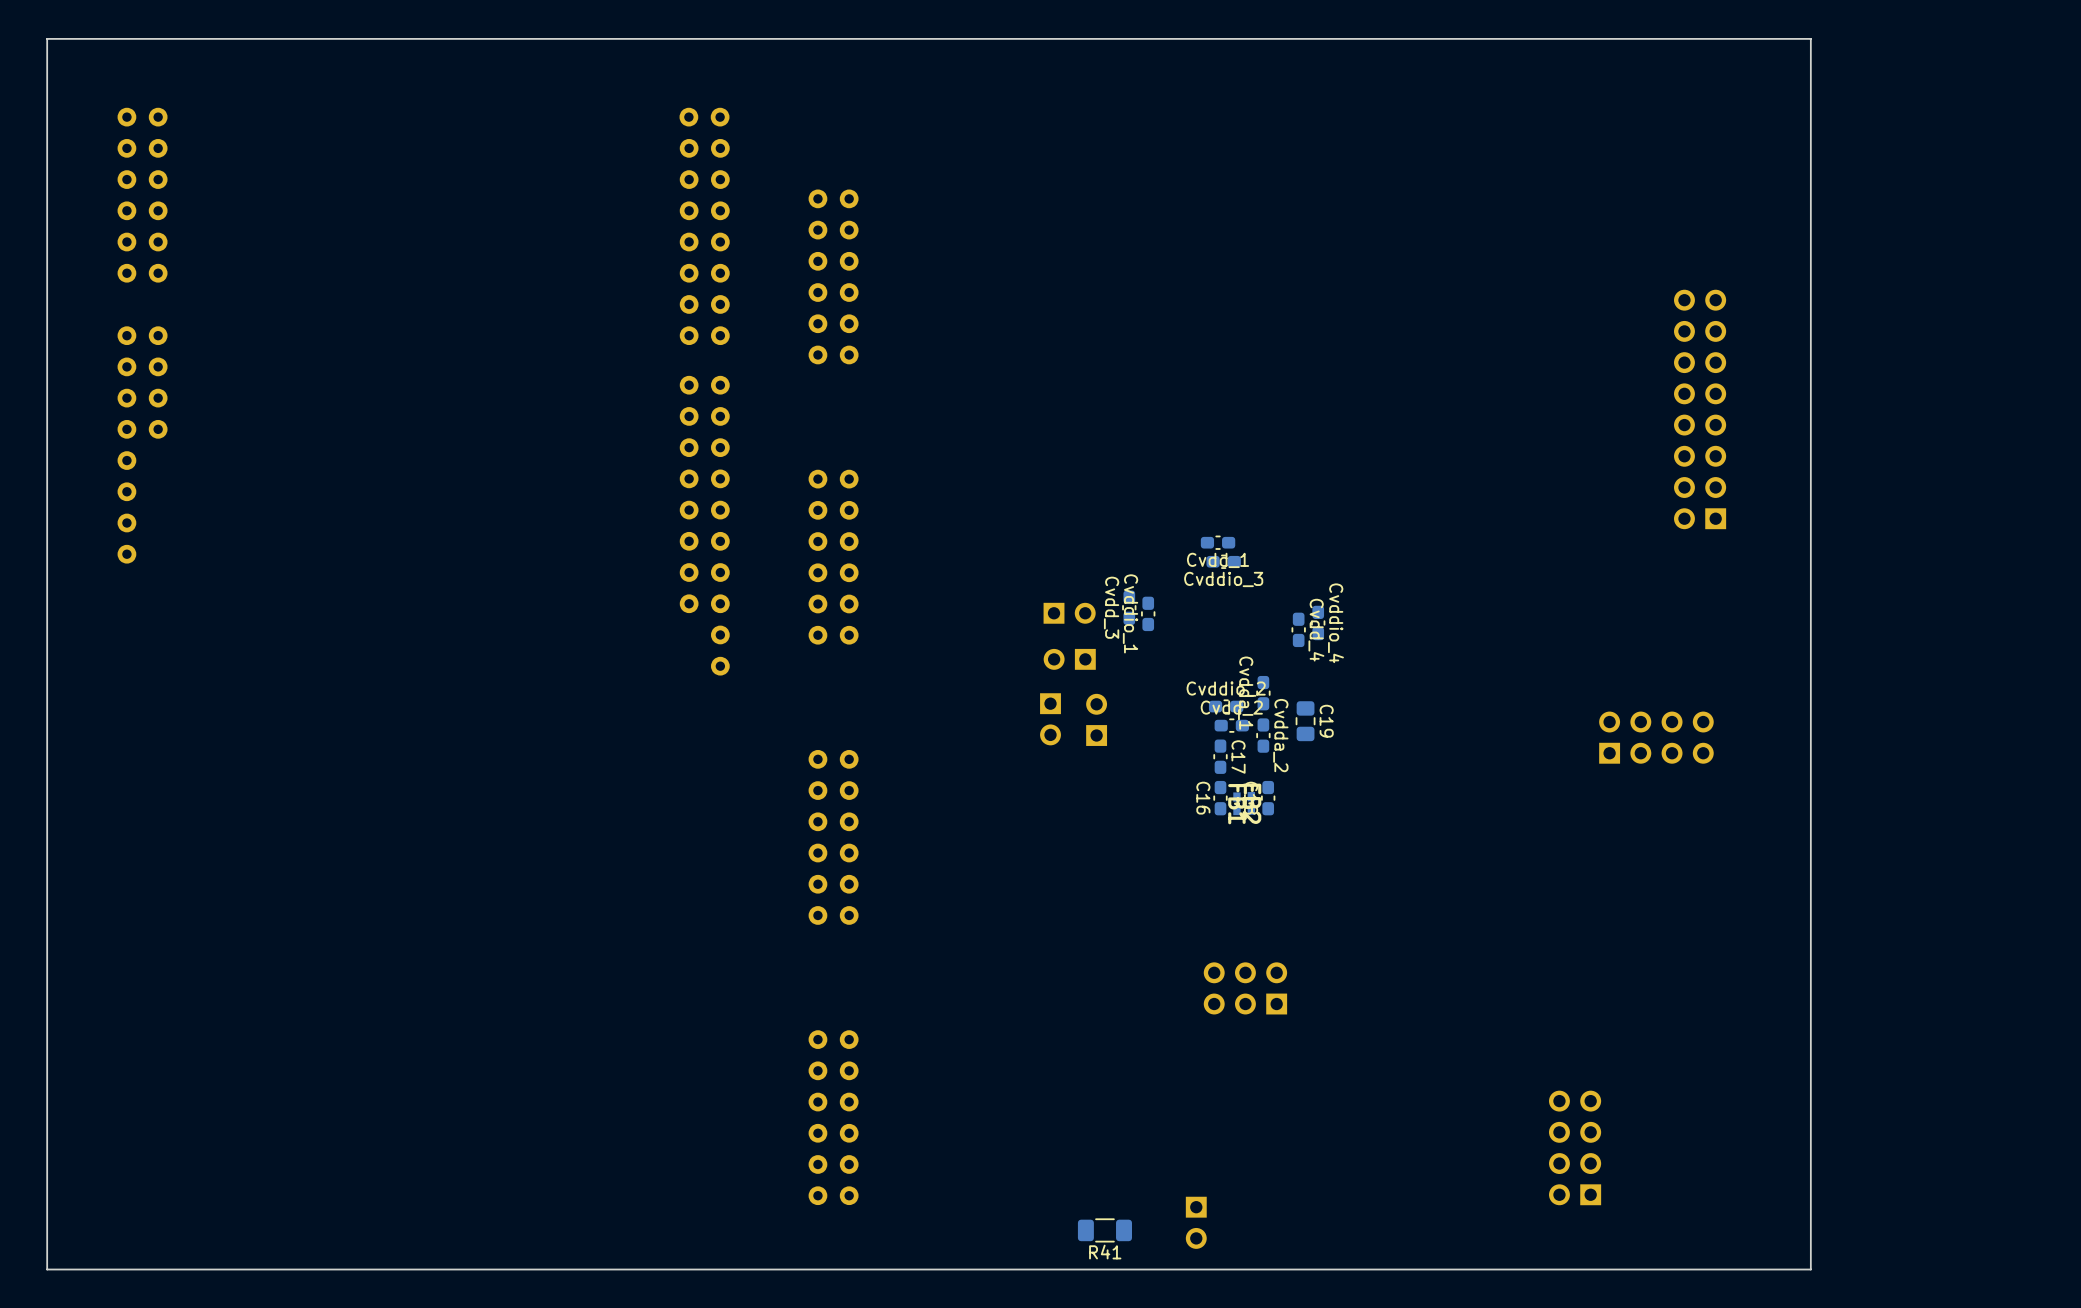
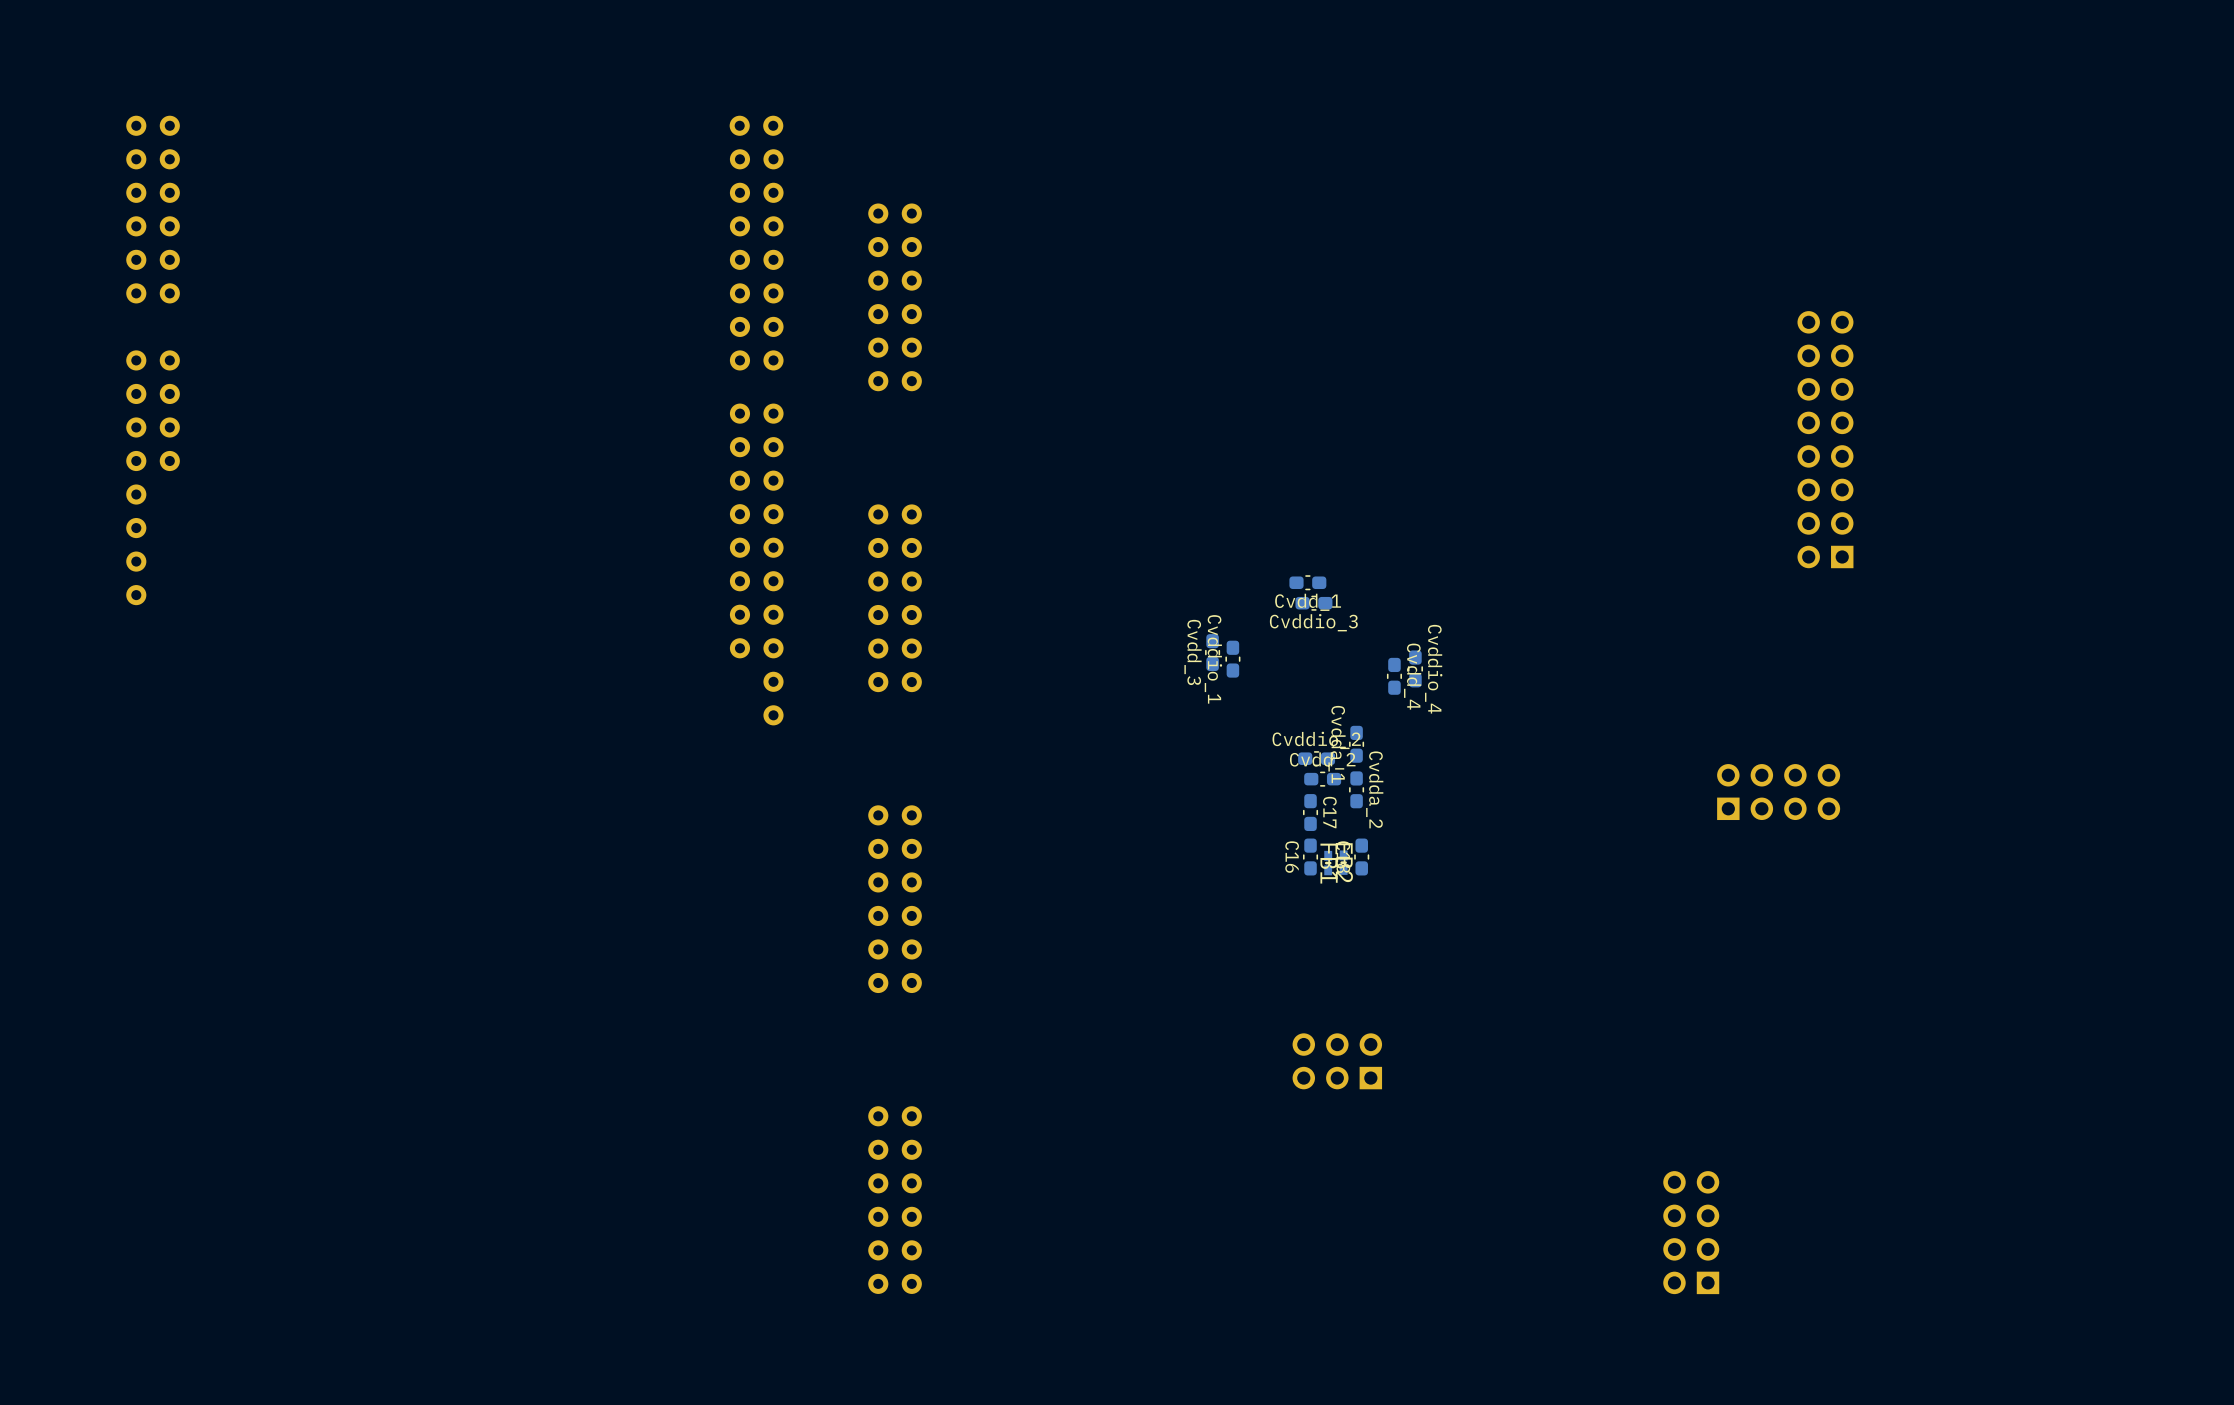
board edge: (1810, 38) (47, 38) (47, 1269) (1810, 1269) (1810, 38) -> none
part: (1069, 613) -> none
part: (1069, 659) -> none
part: (1050, 719) -> none
part: (1096, 719) -> none
C19: (1305, 721) -> none
part: (1196, 1222) -> none
R41: (1104, 1230) -> none

